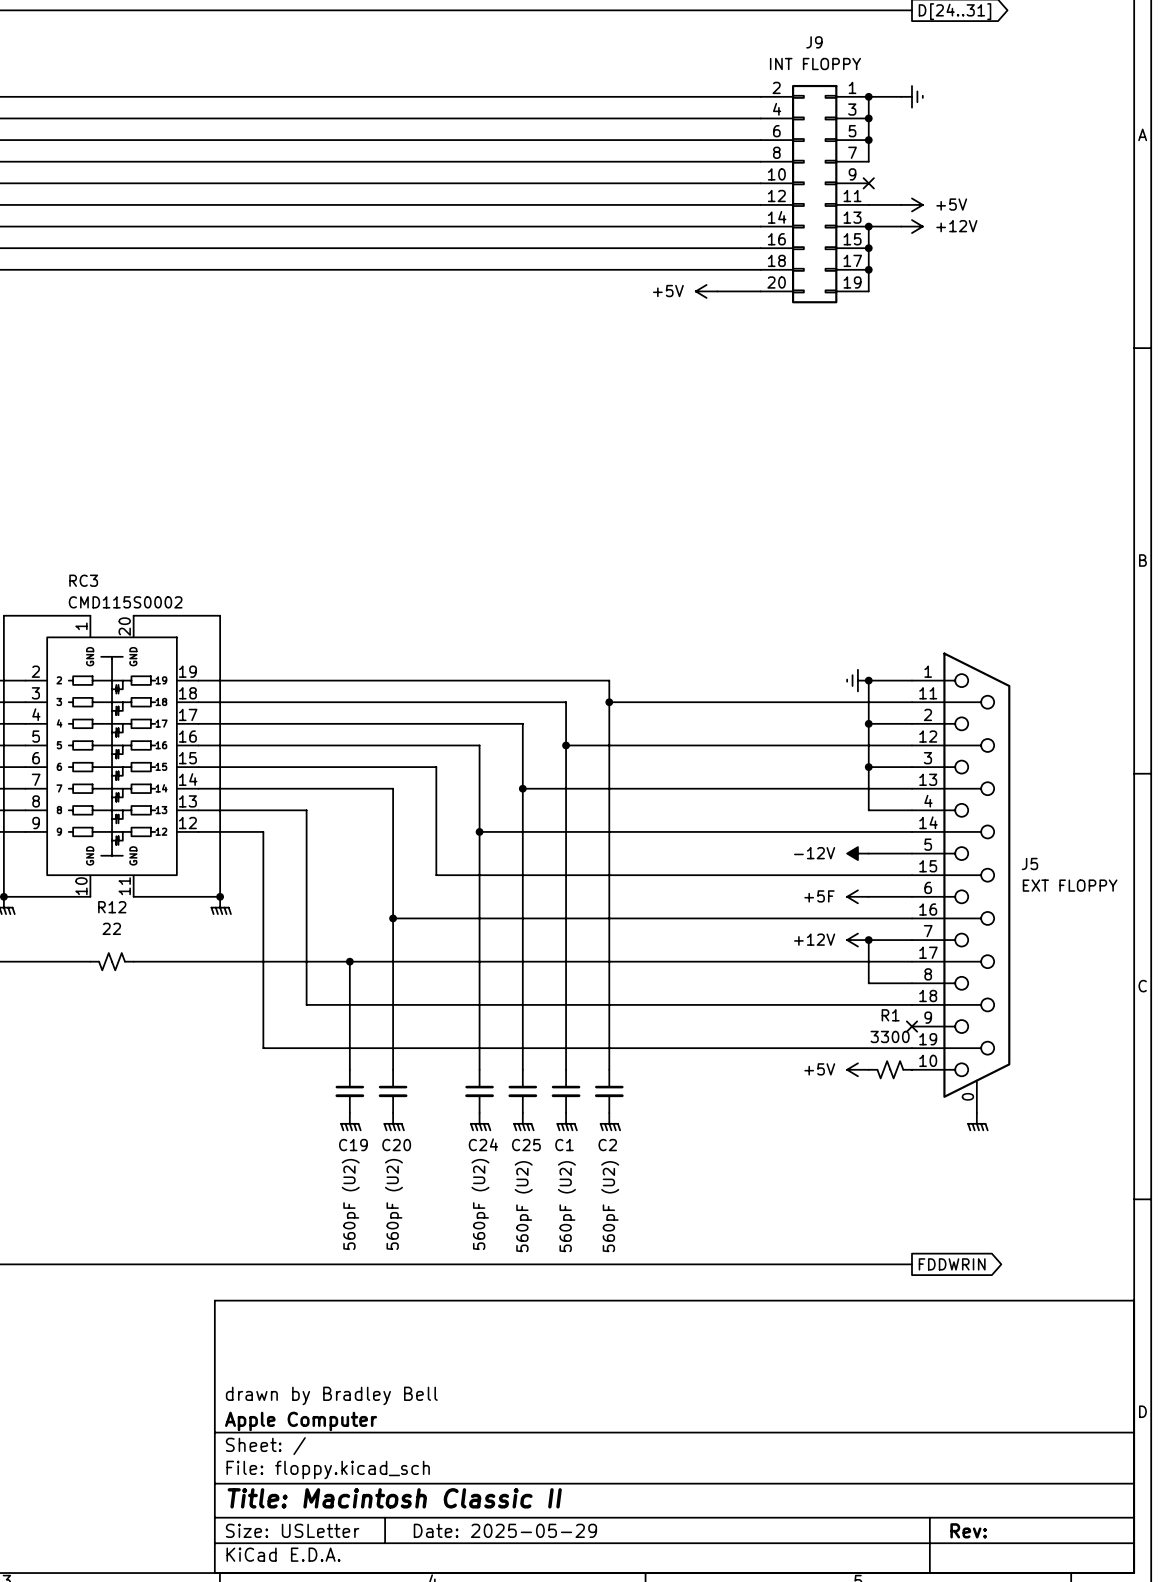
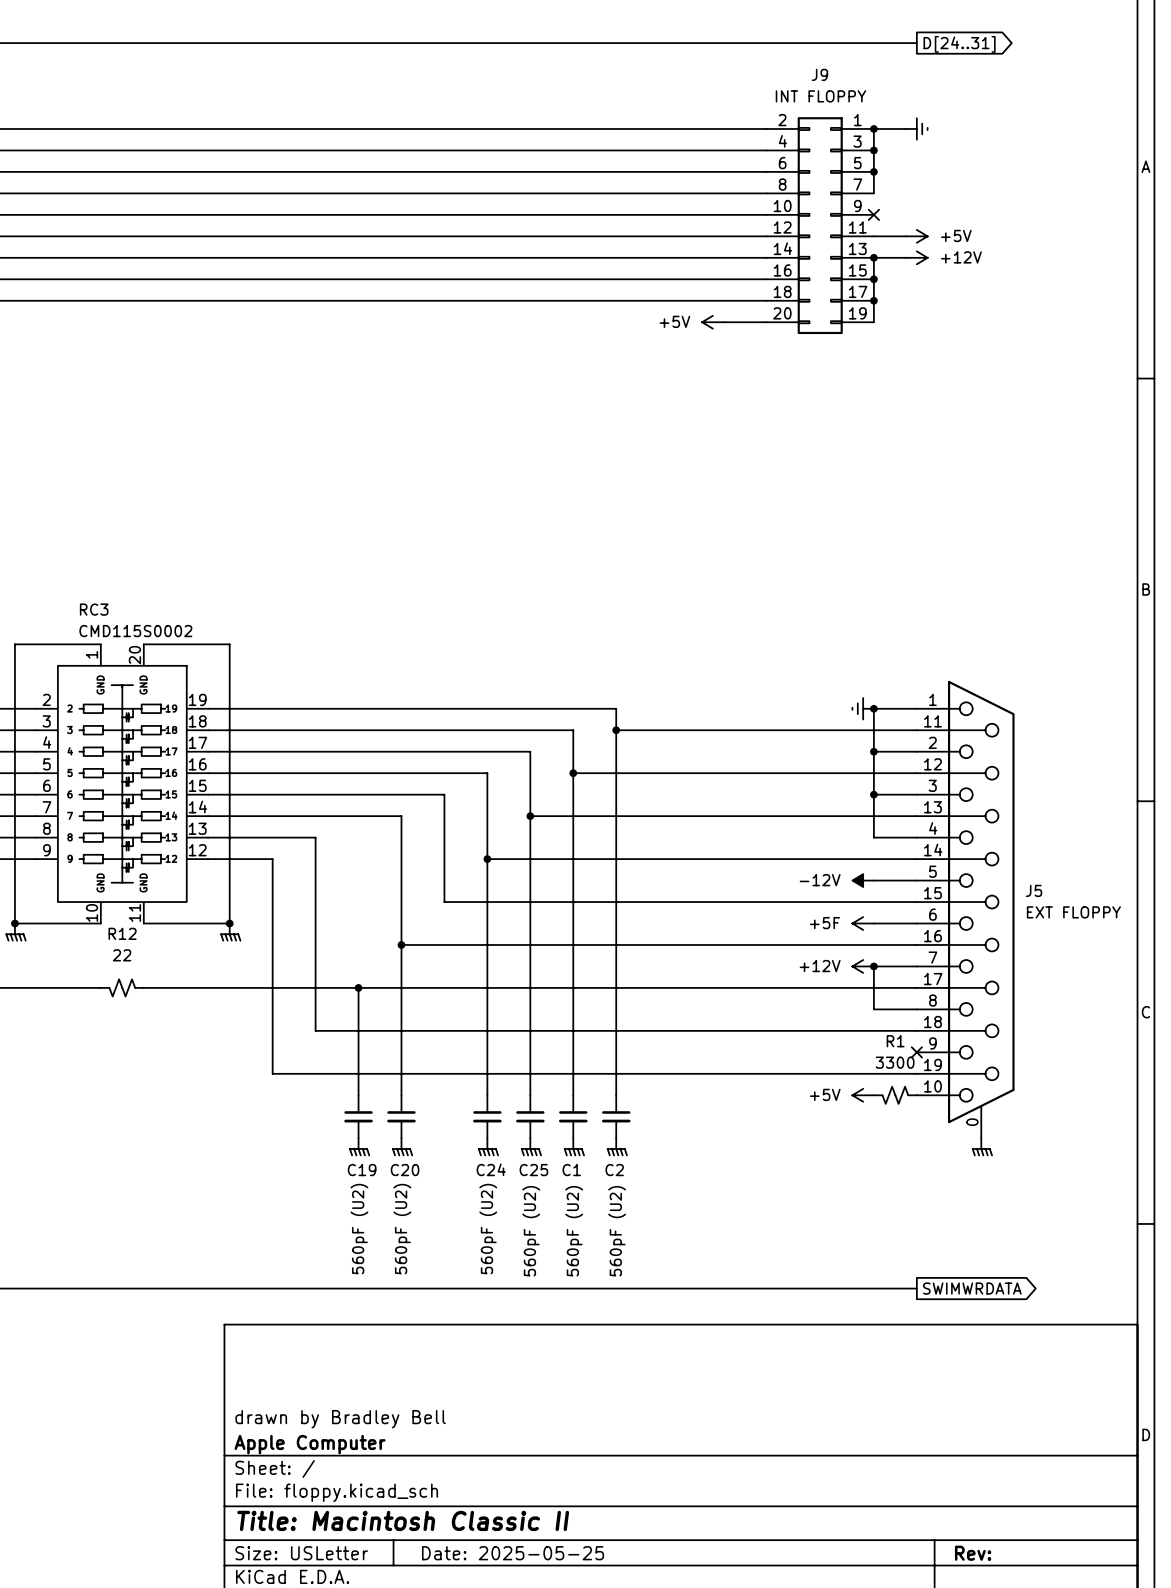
global label: FDDWRIN (952, 1264) -> SWIMWRDATA (972, 1288)
title block: Date: 2025-05-29 (505, 1530) -> Date: 2025-05-25 (513, 1553)

